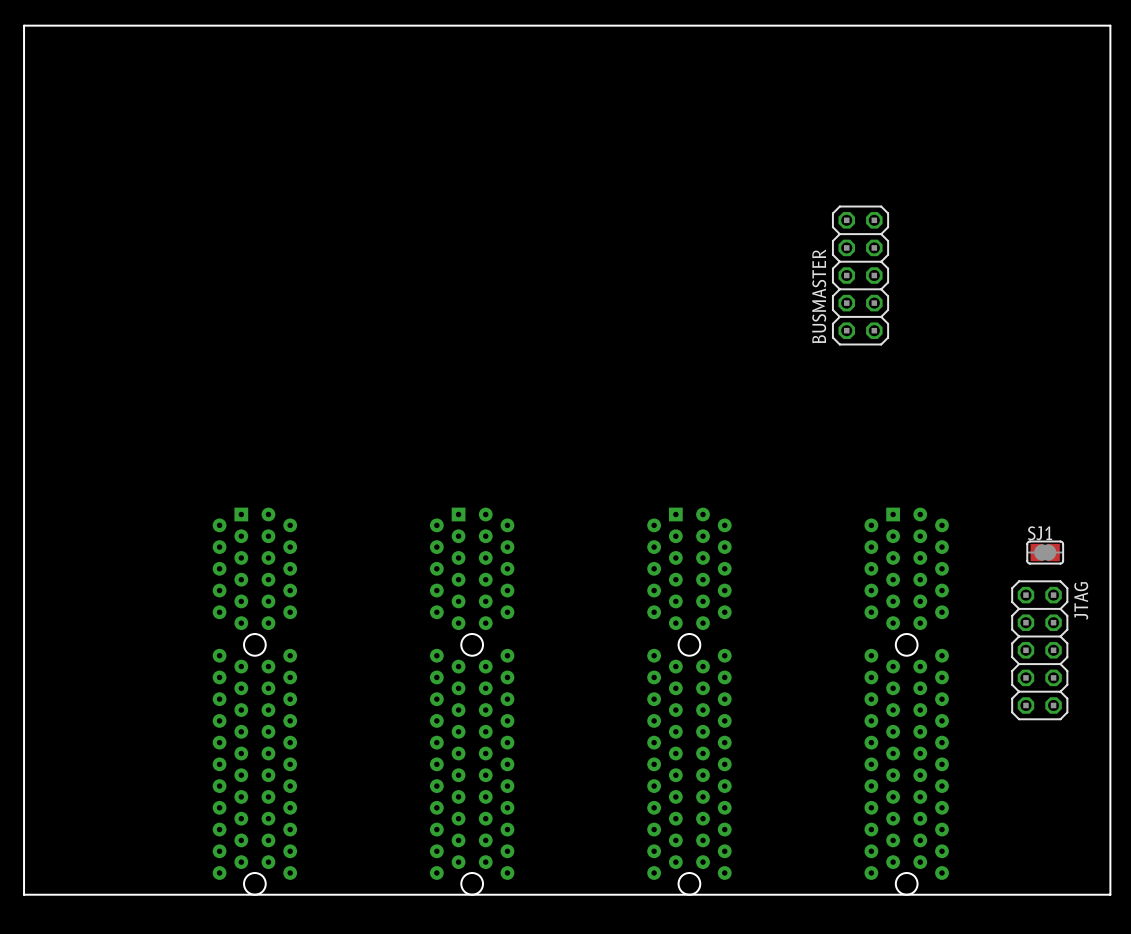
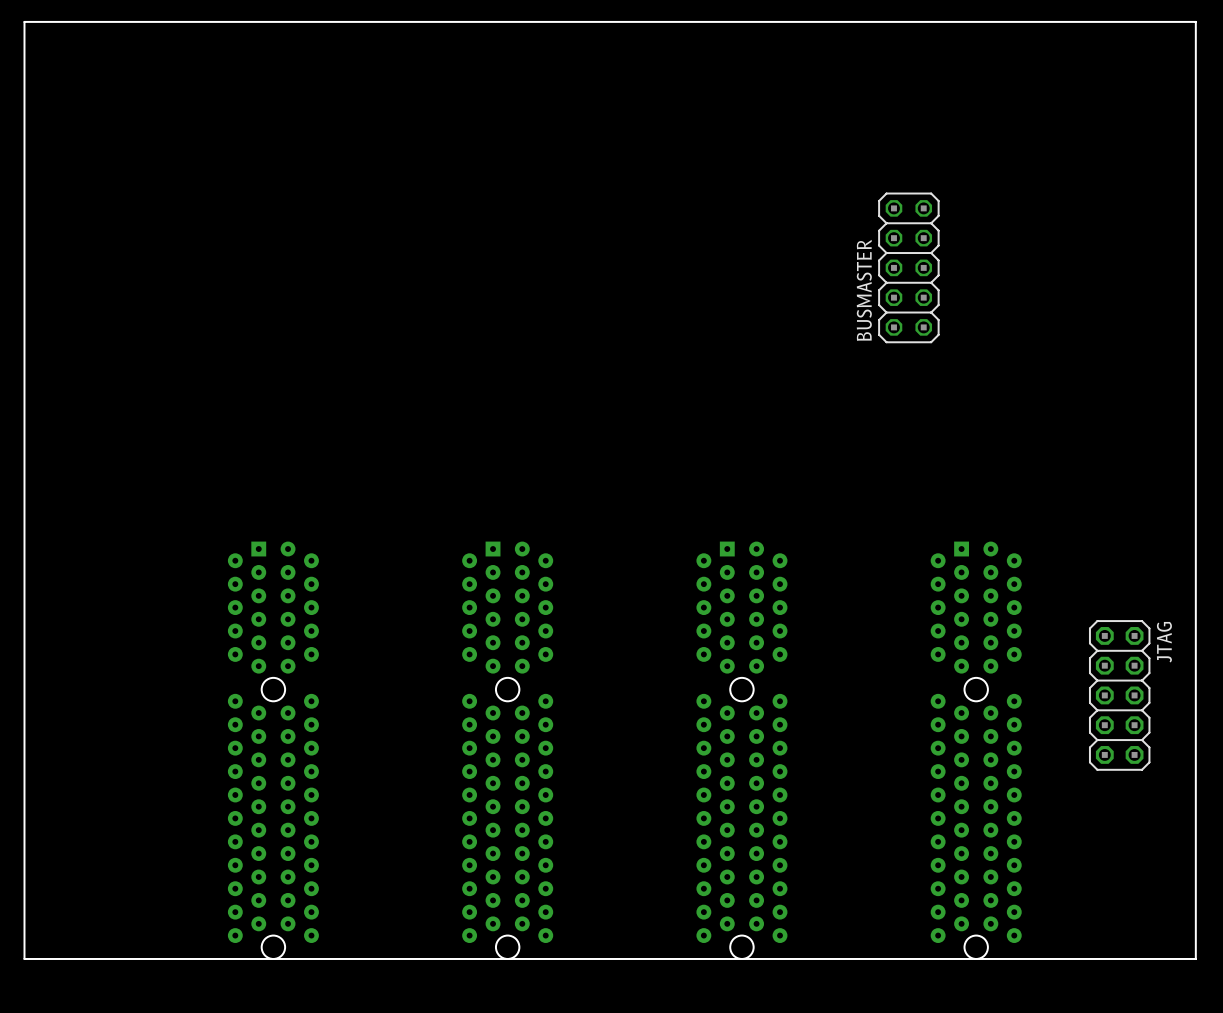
BUSMASTER: none -> (908, 267)
BUSMASTER: (860, 275) -> none
SJ1: (1045, 552) -> none

